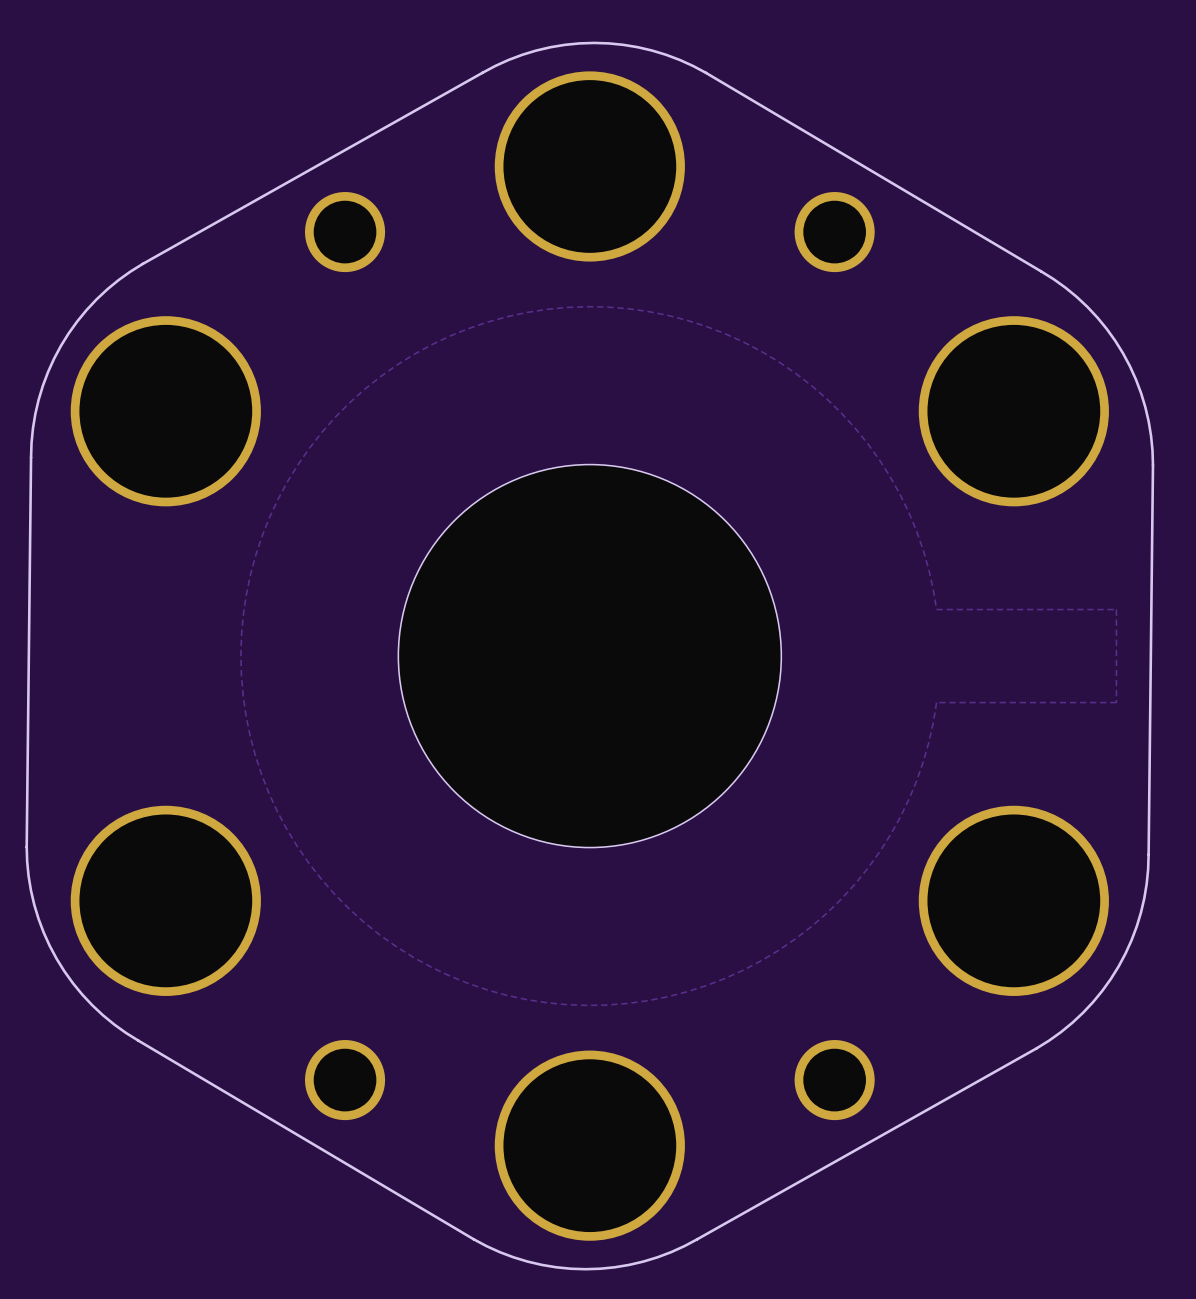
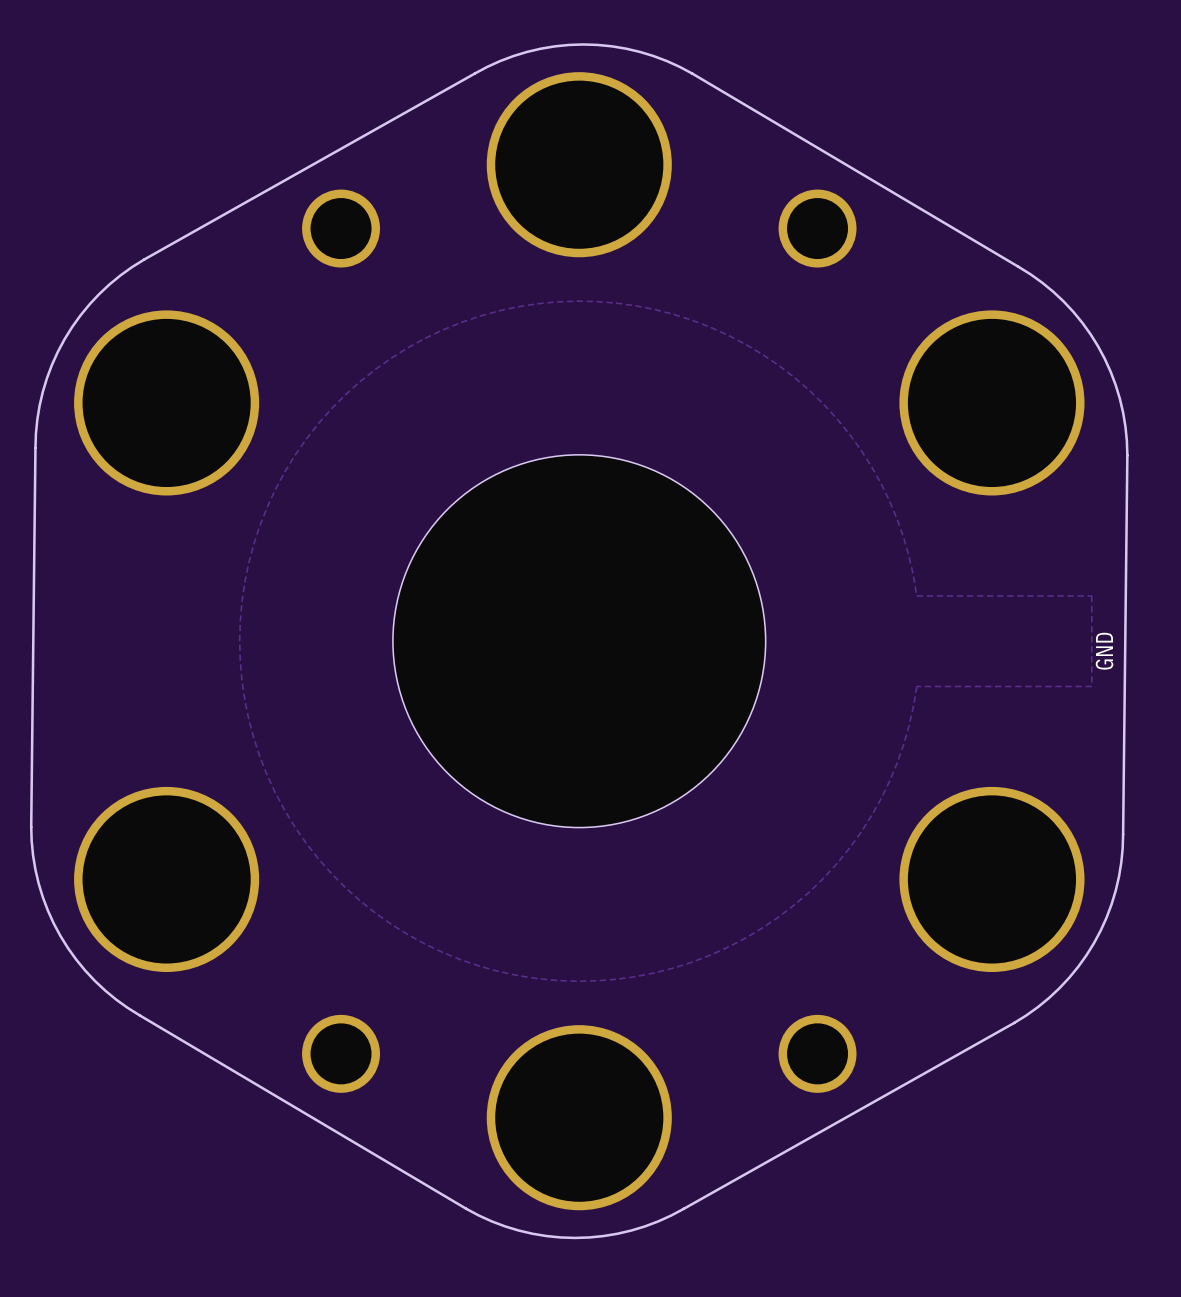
text: none -> GND (1104, 651)

